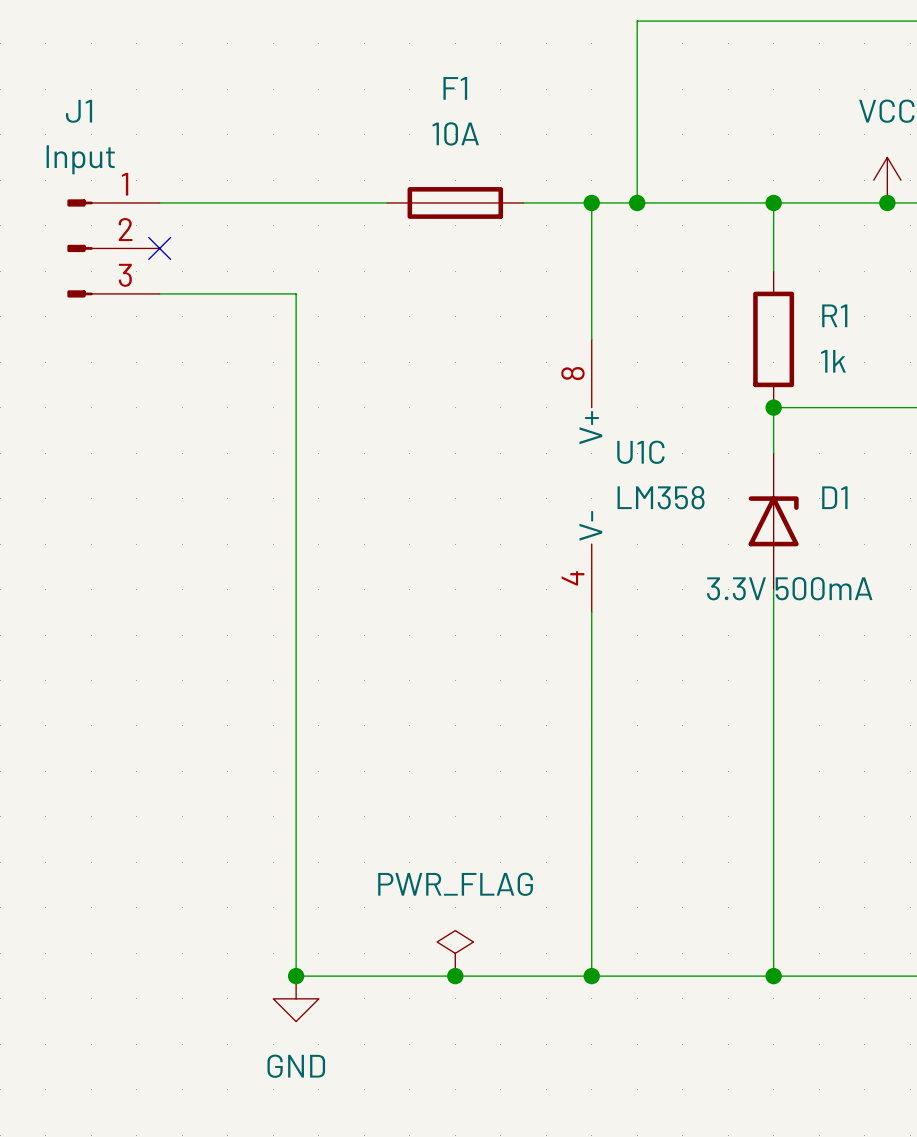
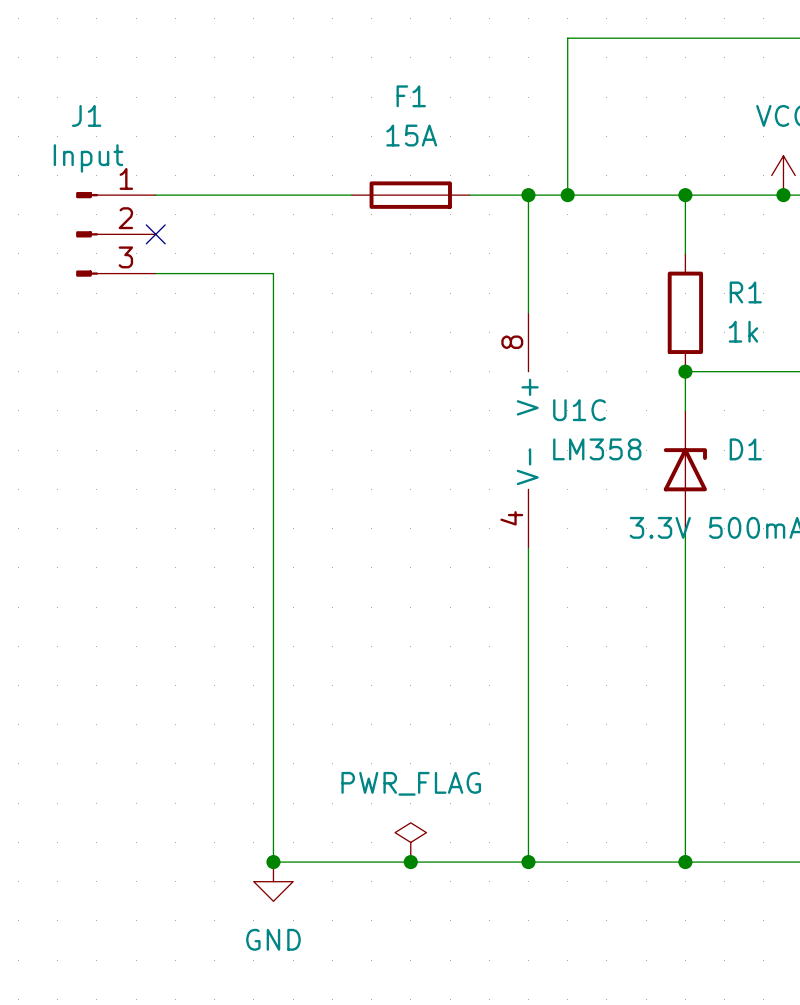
F1 value: 10A (455, 133) -> 15A (411, 135)

